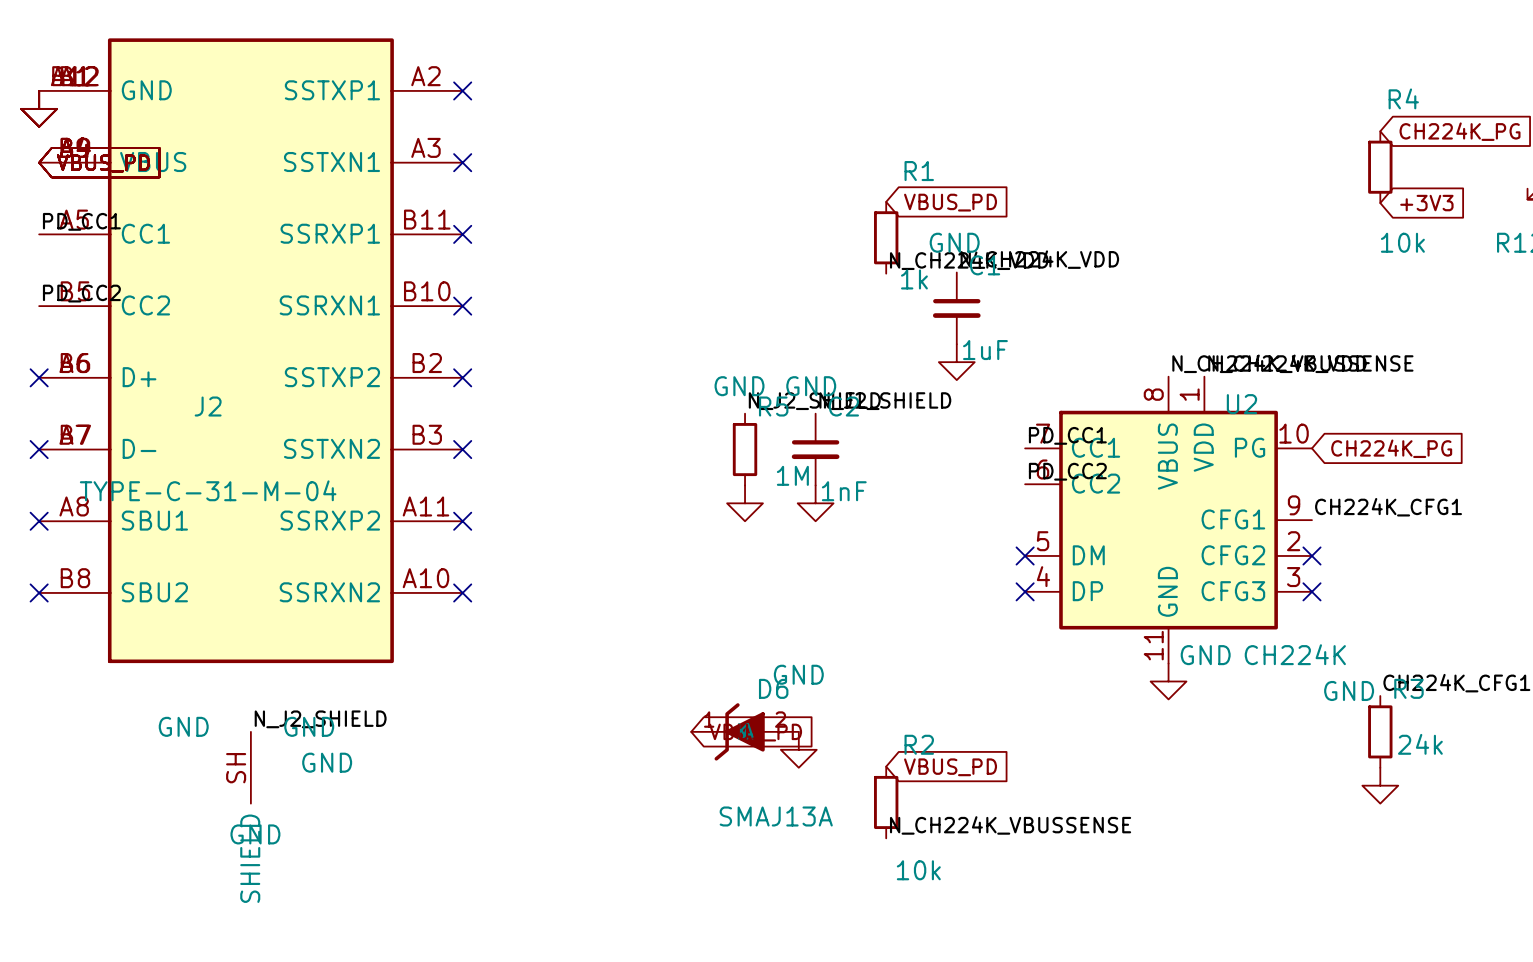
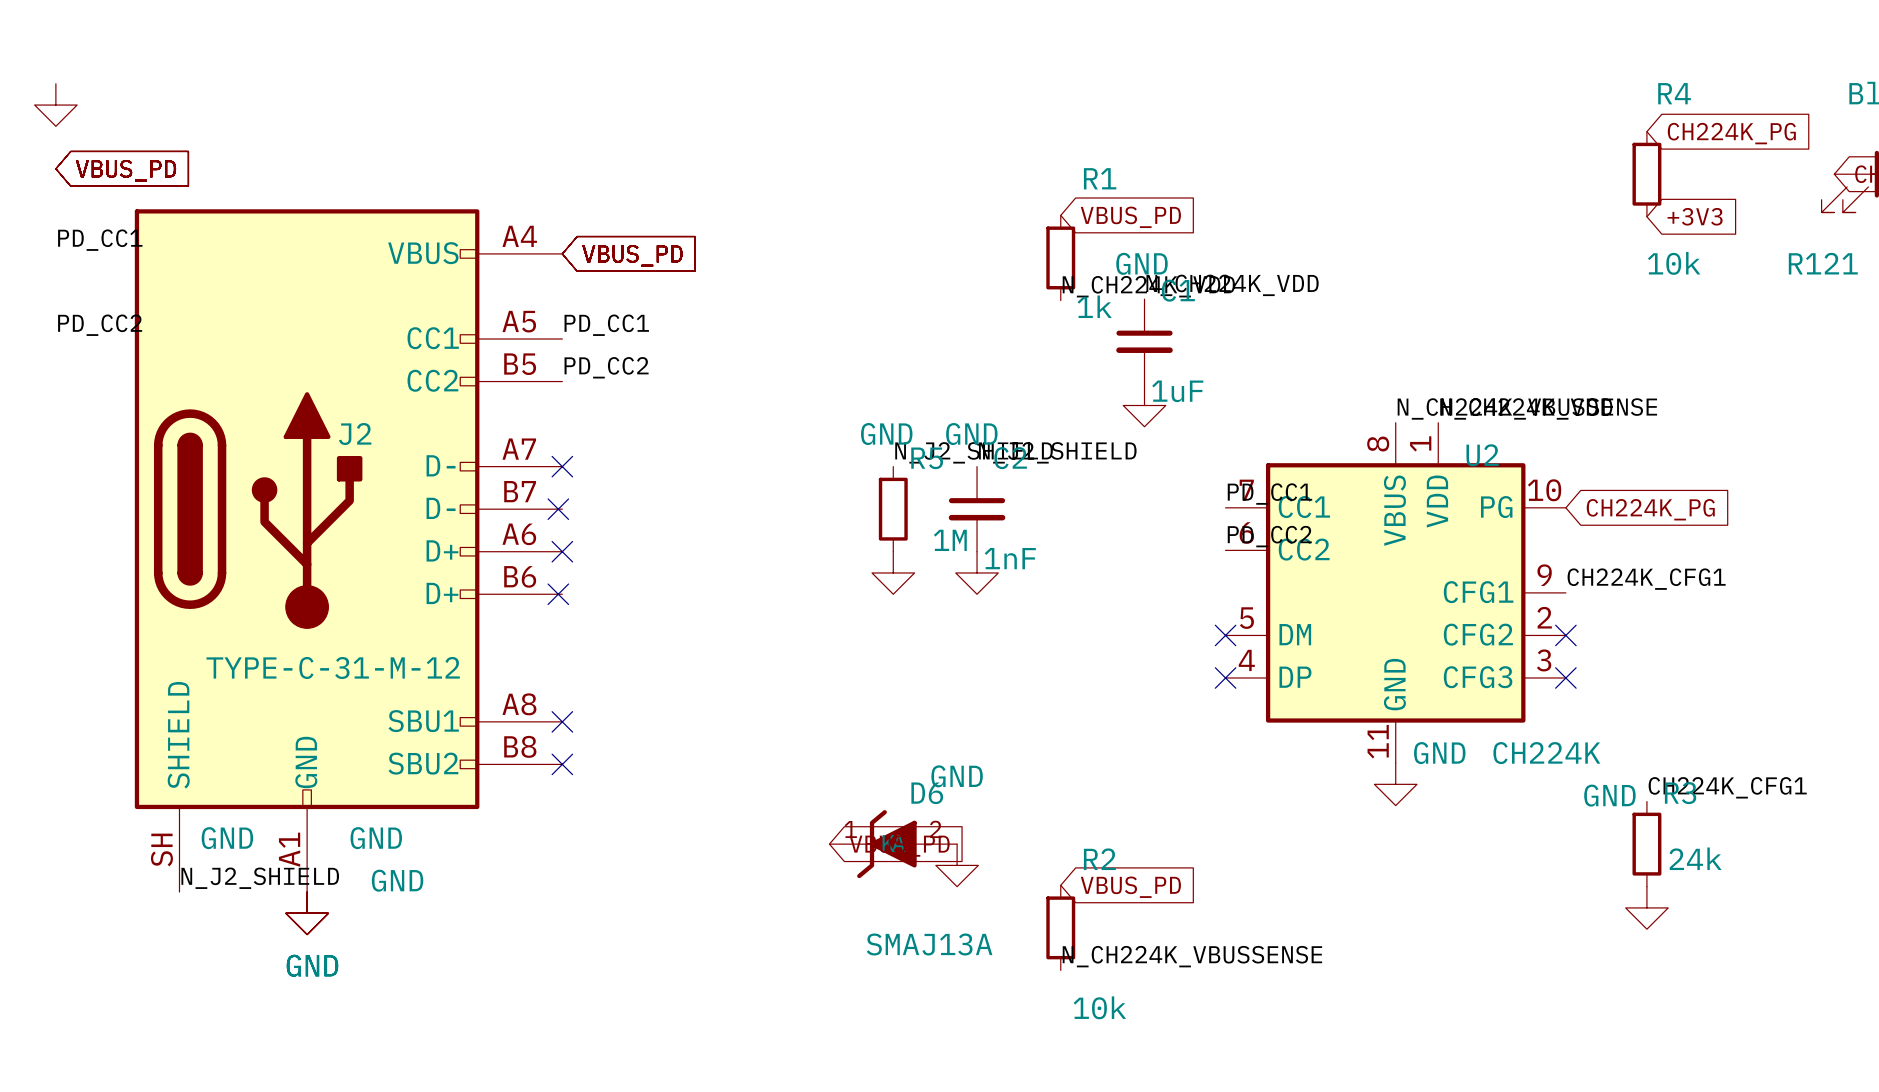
J2 symbol: [39, 38, 463, 804] -> [134, 209, 563, 893]
no-connect mark: (462, 90) -> none
power symbol: GND (39, 108) -> none
power symbol: GND (39, 108) -> none
power symbol: GND (39, 108) -> none
no-connect mark: (462, 162) -> none
no-connect mark: (462, 234) -> none
global label: none -> VBUS_PD (632, 255)
label: none -> PD_CC1 (606, 325)
no-connect mark: (462, 306) -> none
label: none -> PD_CC2 (606, 367)
no-connect mark: (39, 377) -> none
no-connect mark position: (462, 377) -> (562, 466)
J2 name position: J2 (208, 406) -> J2 (355, 434)
no-connect mark: (39, 449) -> none
no-connect mark: none -> (562, 551)
J2 value: TYPE-C-31-M-04 (208, 490) -> TYPE-C-31-M-12 (333, 667)
no-connect mark: (39, 521) -> none
no-connect mark: (39, 592) -> none
no-connect mark: (462, 592) -> none
no-connect mark: none -> (562, 721)
no-connect mark: none -> (562, 764)
label position: N_J2_SHIELD (320, 719) -> N_J2_SHIELD (260, 878)
power symbol: none -> GND (307, 913)
power symbol: none -> GND (307, 913)
power symbol: none -> GND (307, 913)
power symbol: none -> GND (307, 913)

